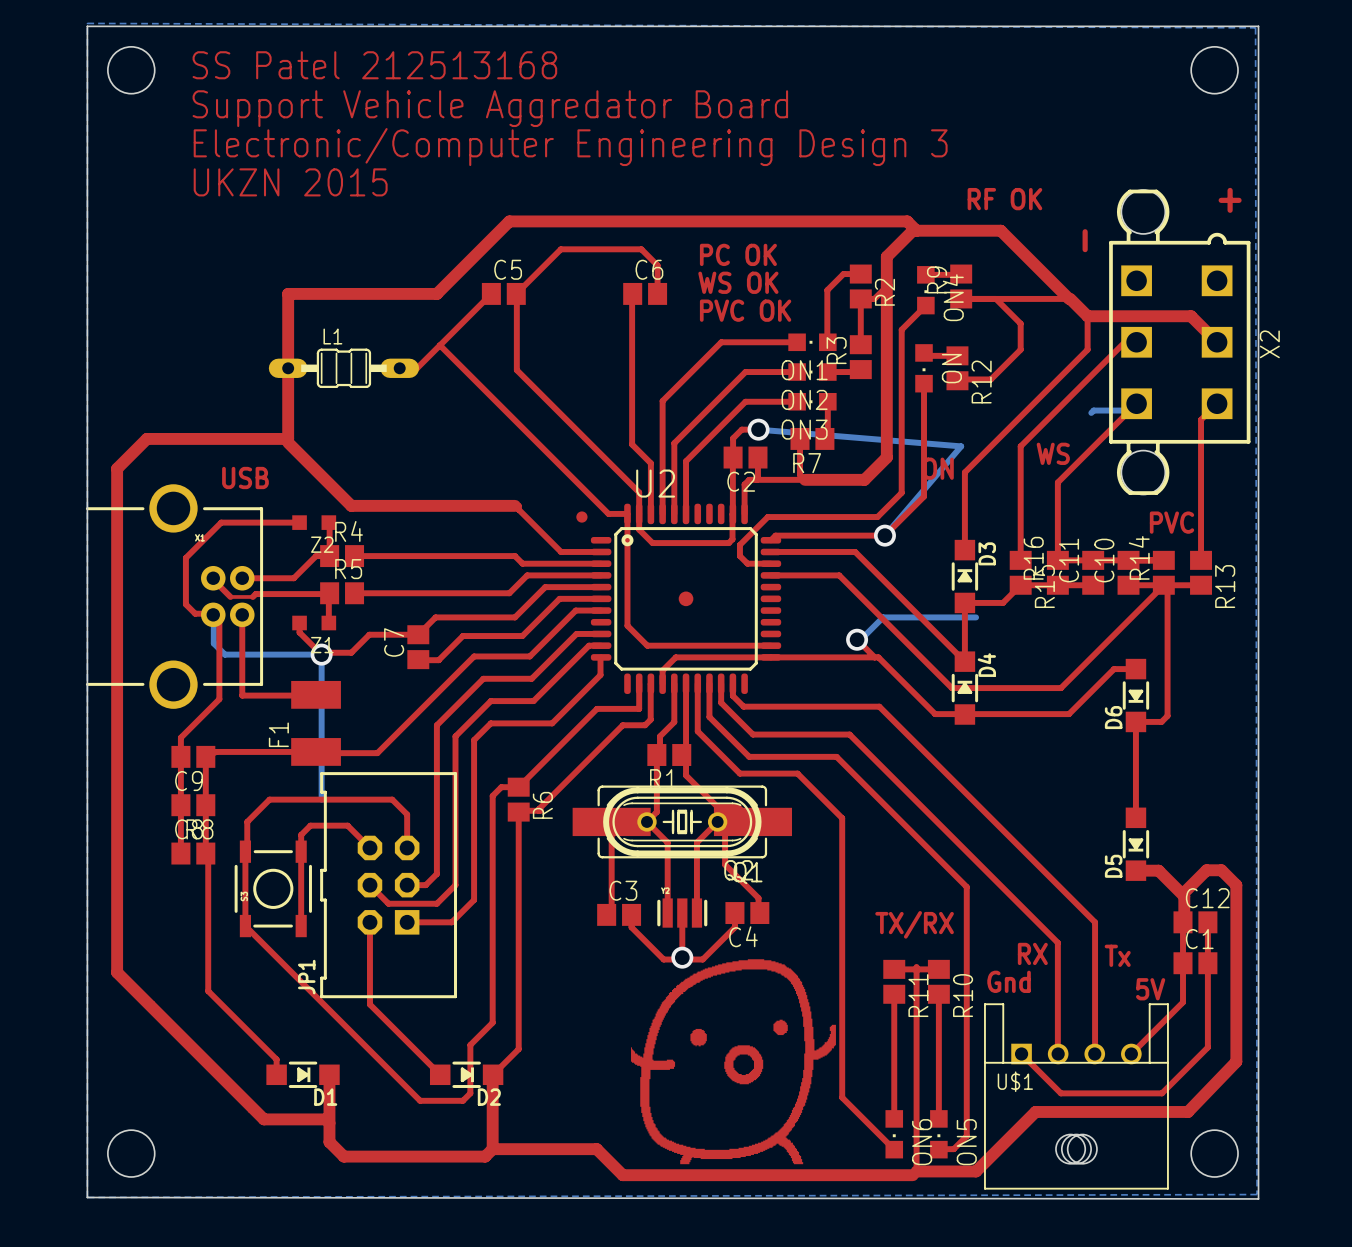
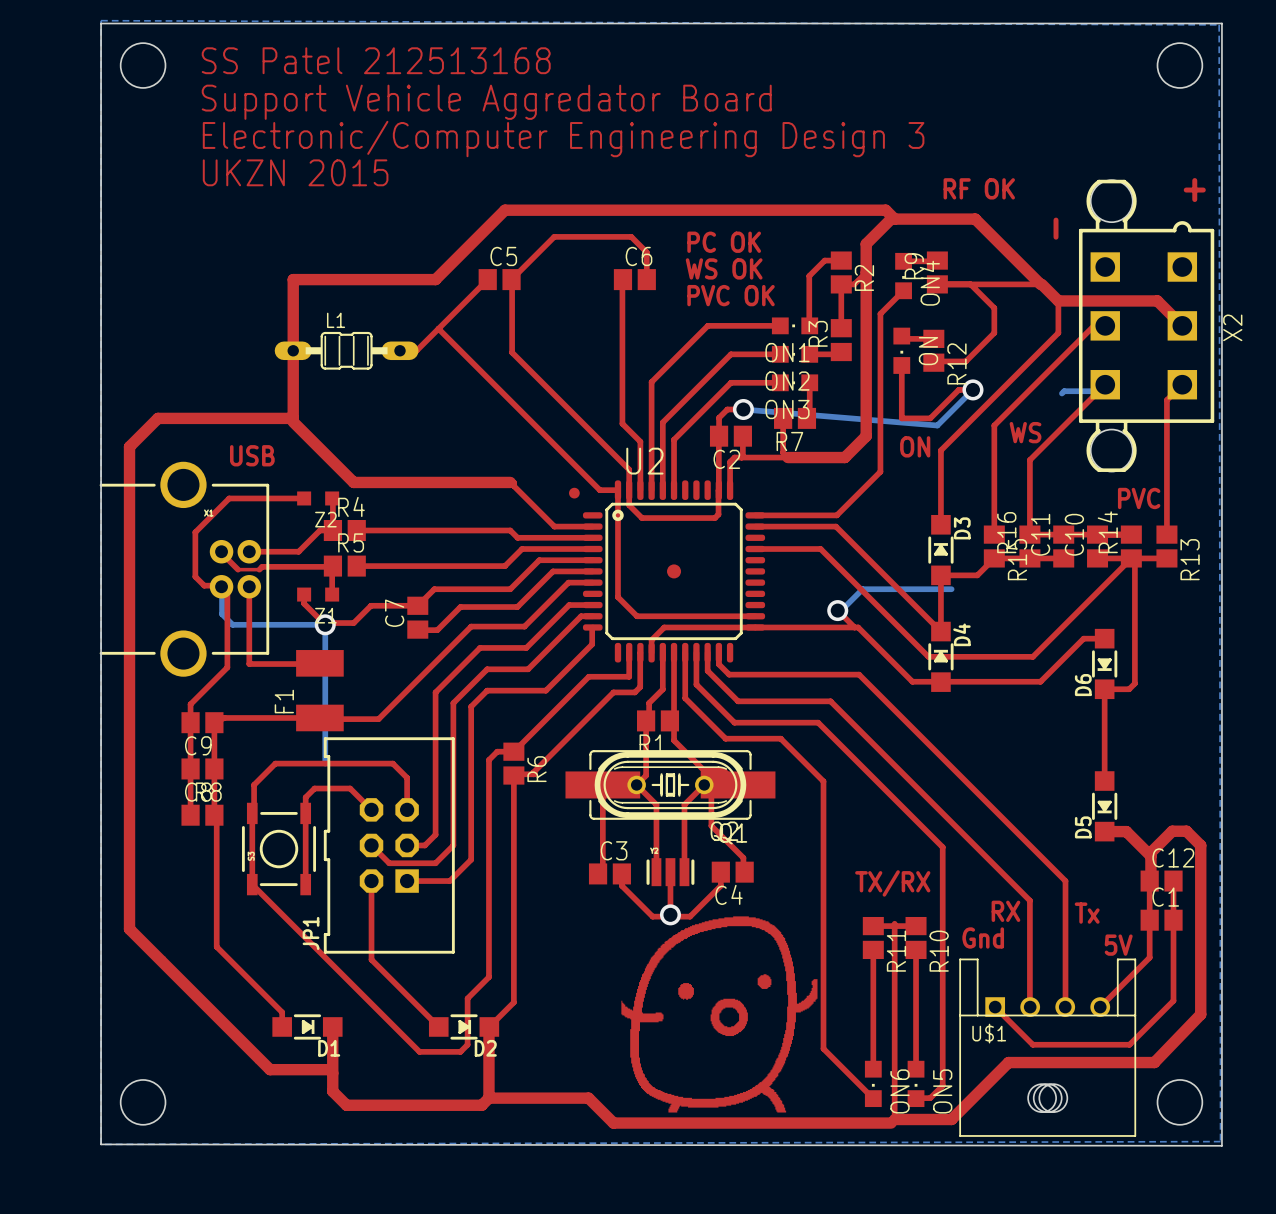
via: none -> (972, 389)
top track: (924, 438) (924, 496) (884, 535) (775, 535) (770, 540) -> (901, 418) (930, 418) (958, 389) (972, 389)
bottom track: (961, 446) (884, 535) -> (937, 425) (972, 389)
top track: (901, 492) (877, 517) (767, 517) (739, 544) (739, 556) (747, 563) (770, 563) -> (880, 470) (836, 515) (755, 515)
via: (884, 535) -> none

